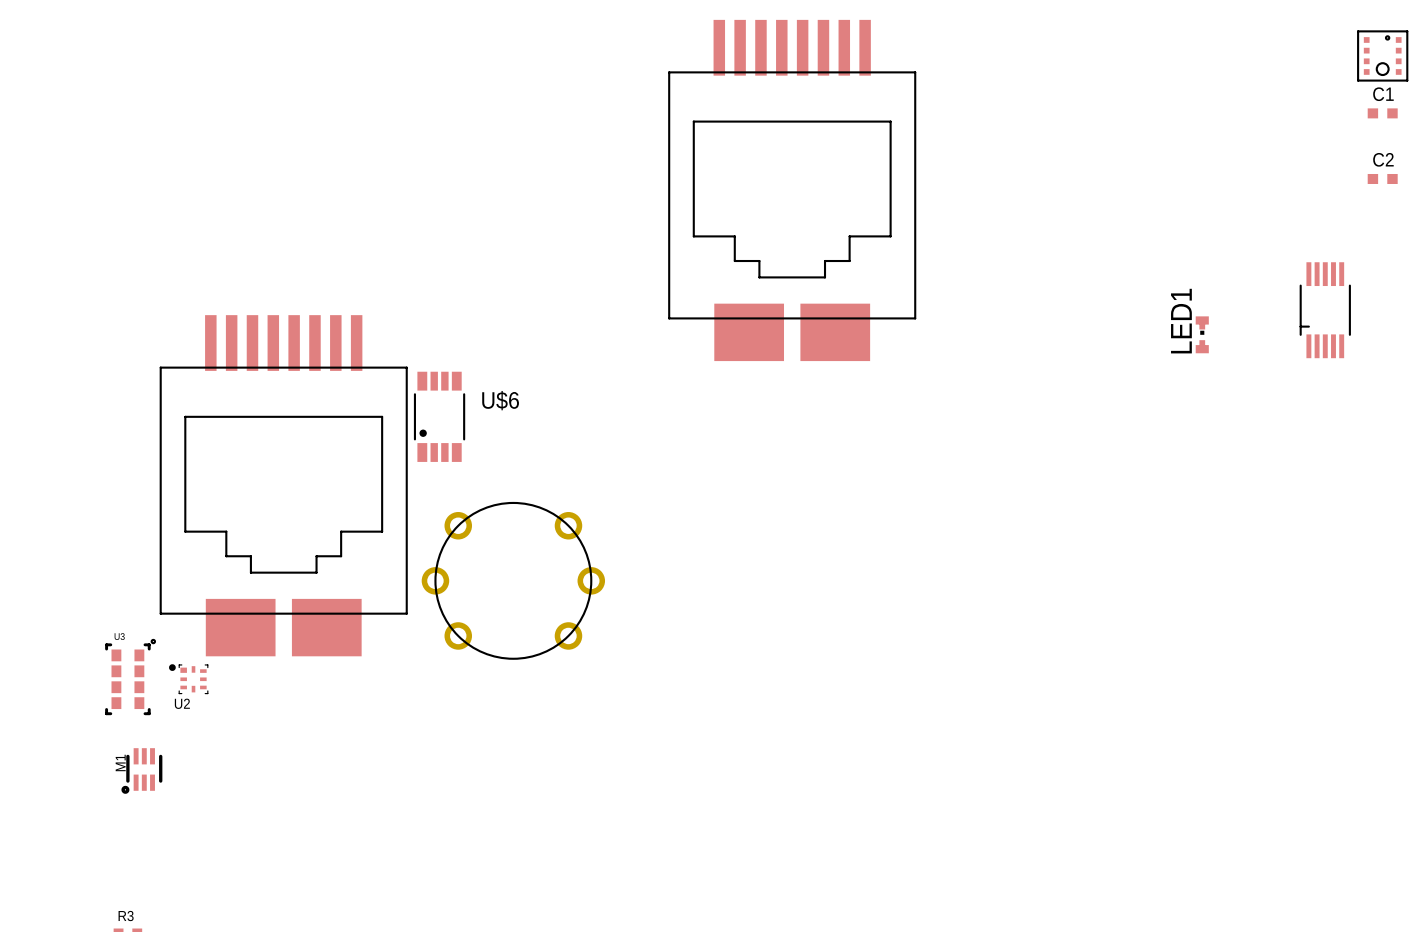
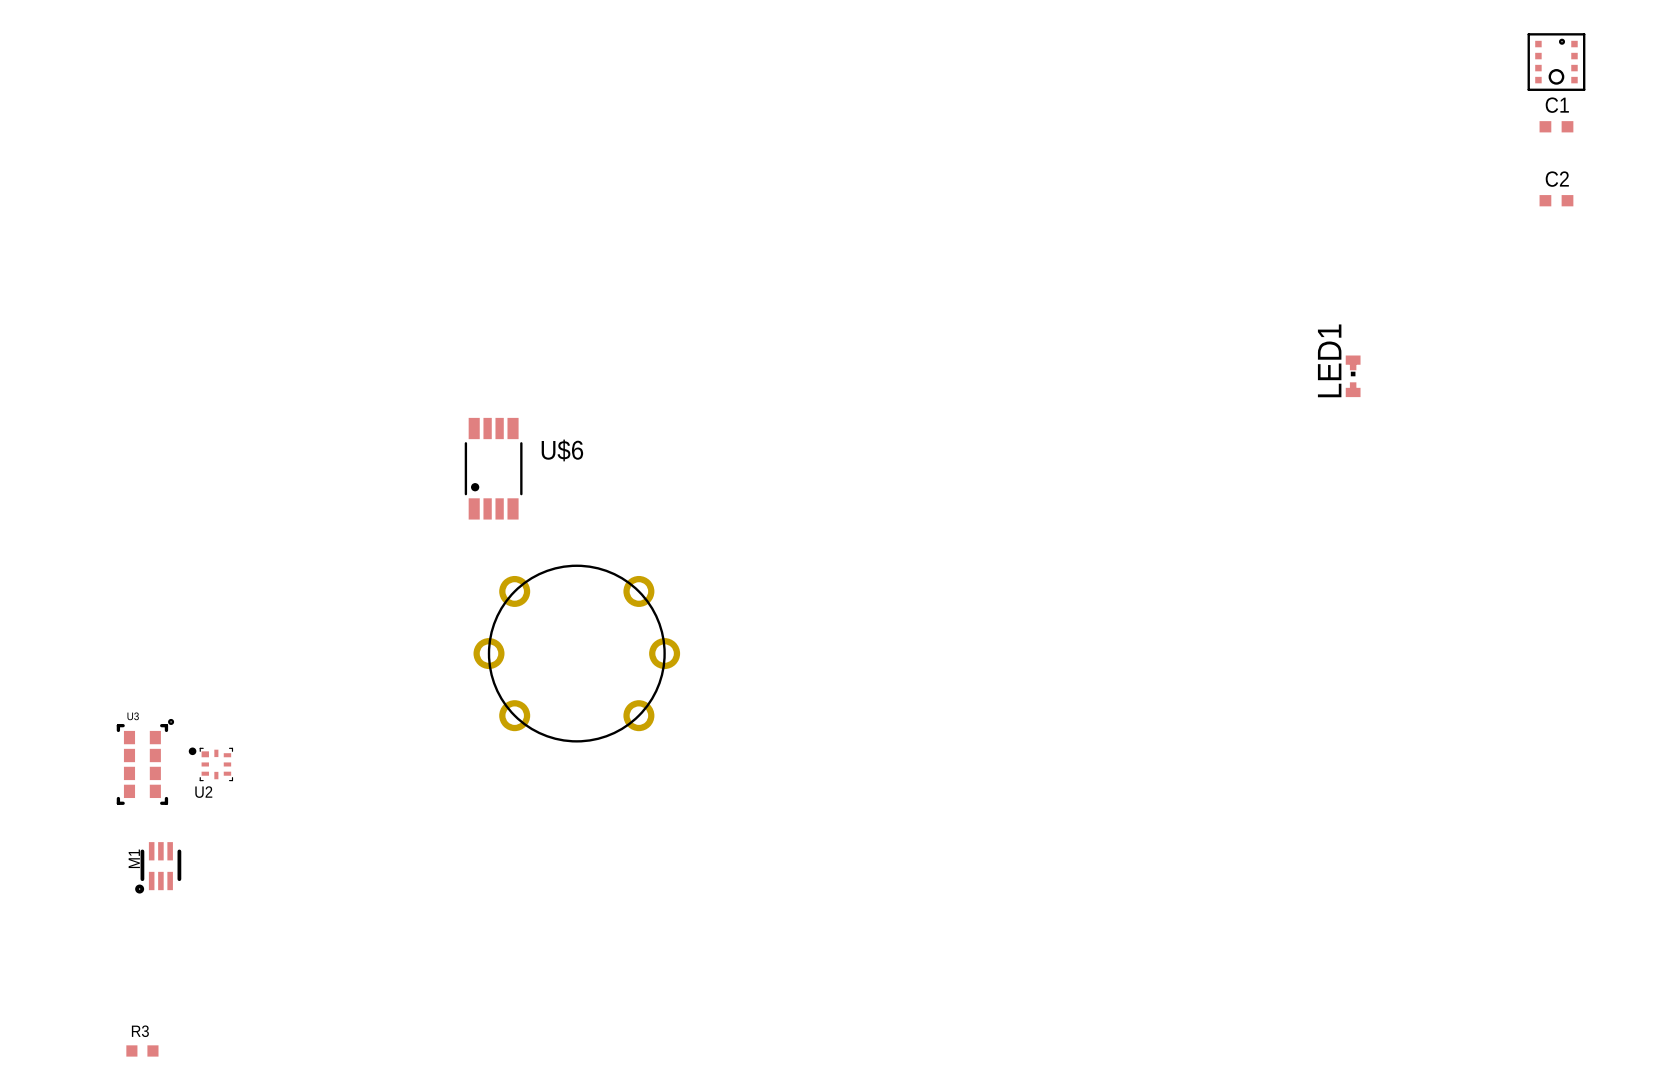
part: (792, 190) -> none
part: (1325, 310) -> none
part: (283, 485) -> none

